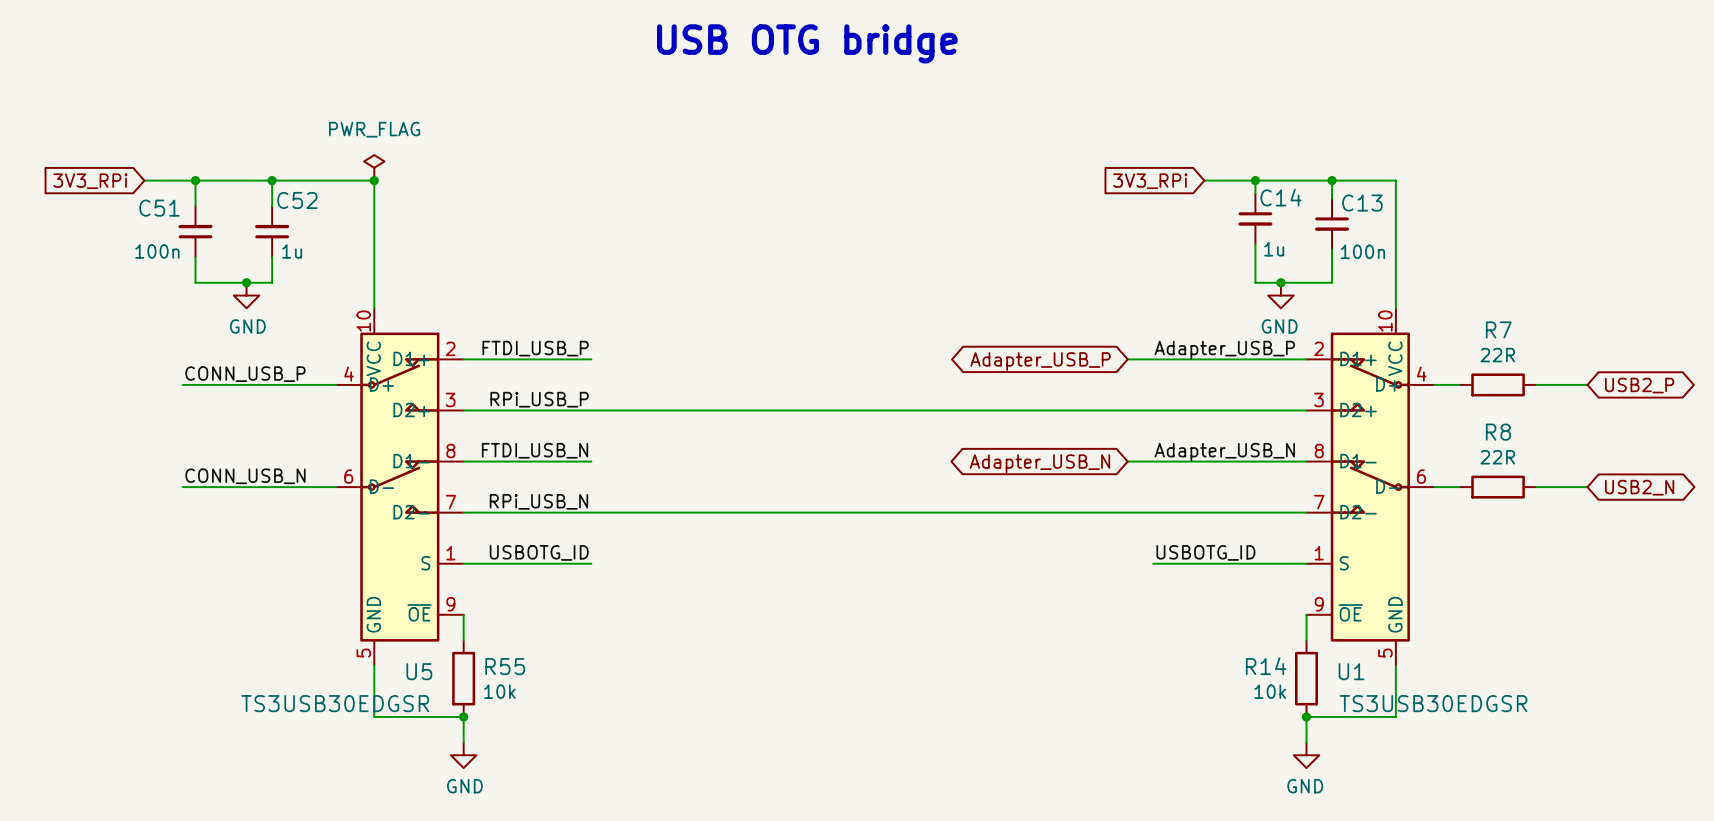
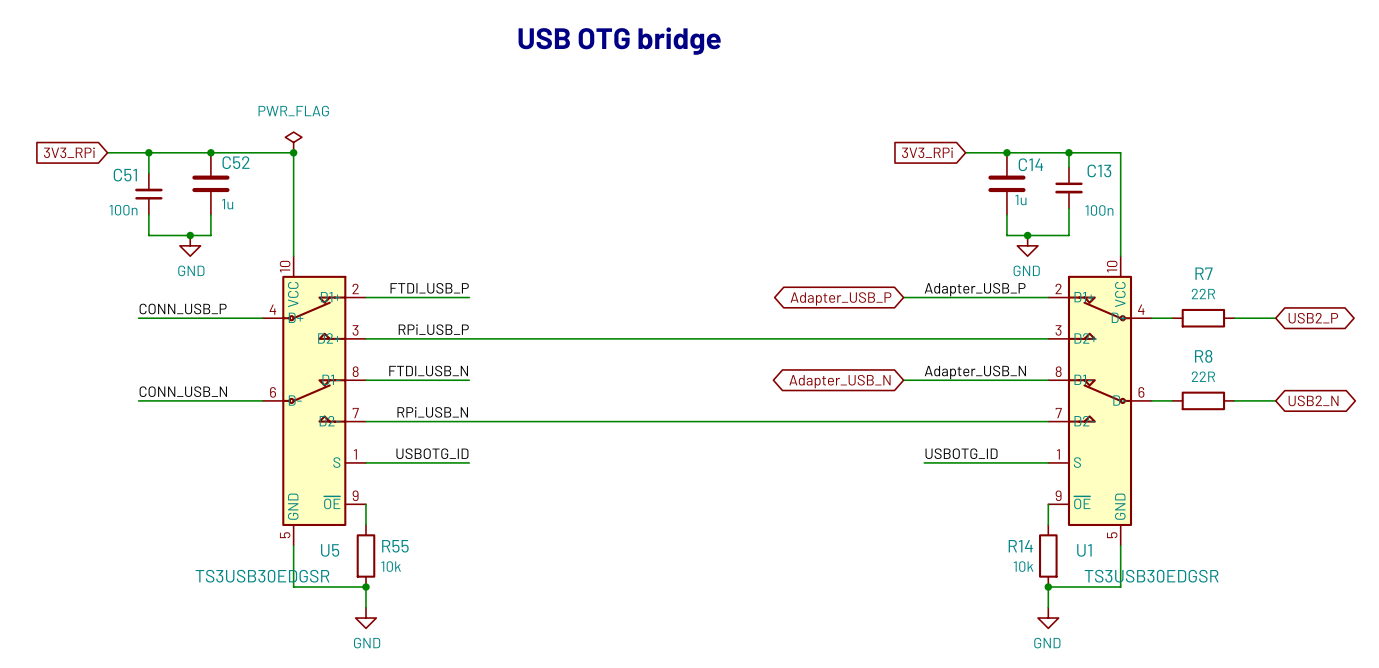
C14 symbol: [1238, 193, 1273, 245] -> [988, 152, 1026, 215]
C52 symbol: [255, 206, 290, 258] -> [192, 152, 230, 215]

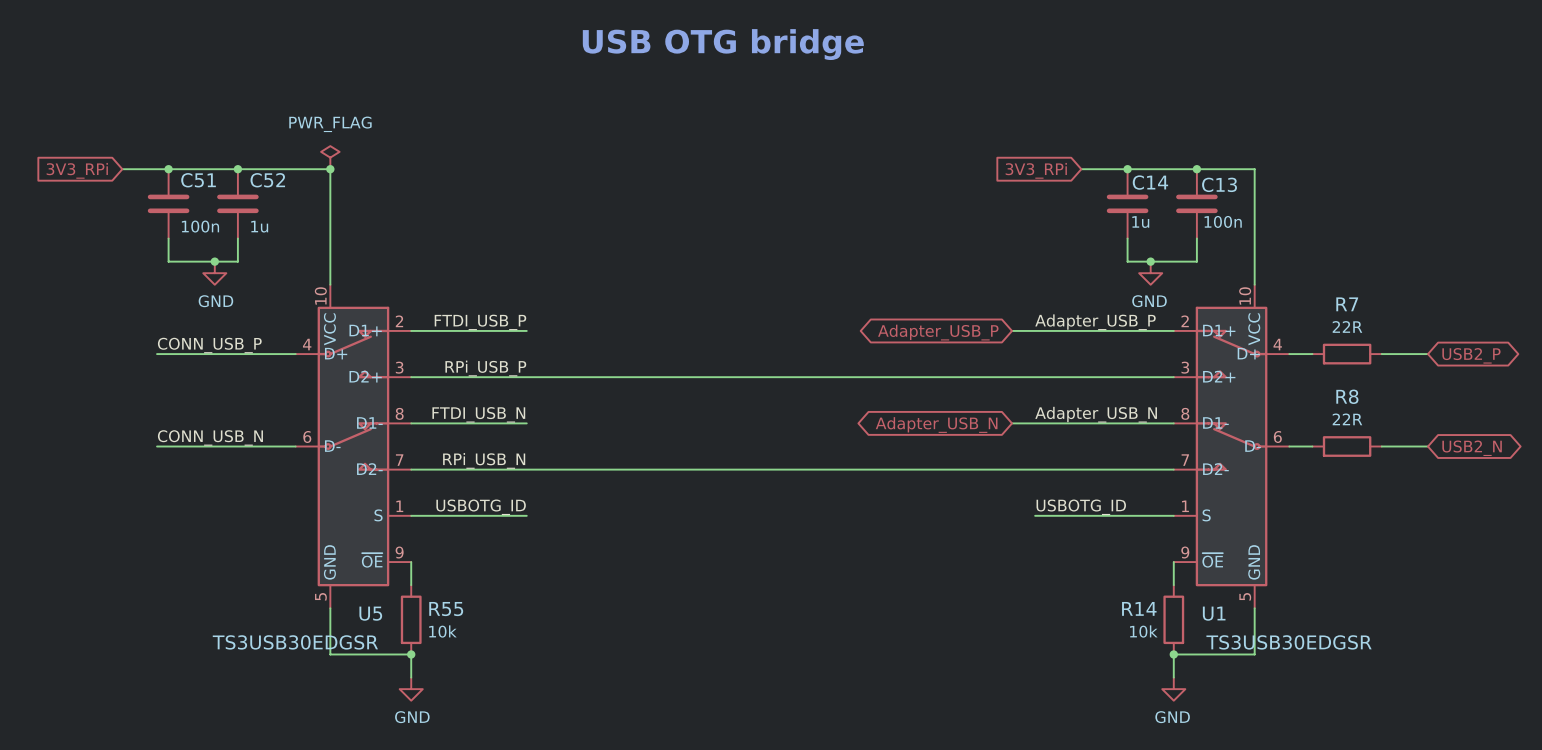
C13 symbol: [1055, 167, 1083, 209] -> [1176, 169, 1218, 239]
C51 symbol: [135, 173, 163, 215] -> [147, 169, 190, 239]
C51 name position: C51 (125, 175) -> C51 (198, 180)
C51 text position: 100n (123, 210) -> 100n (200, 226)

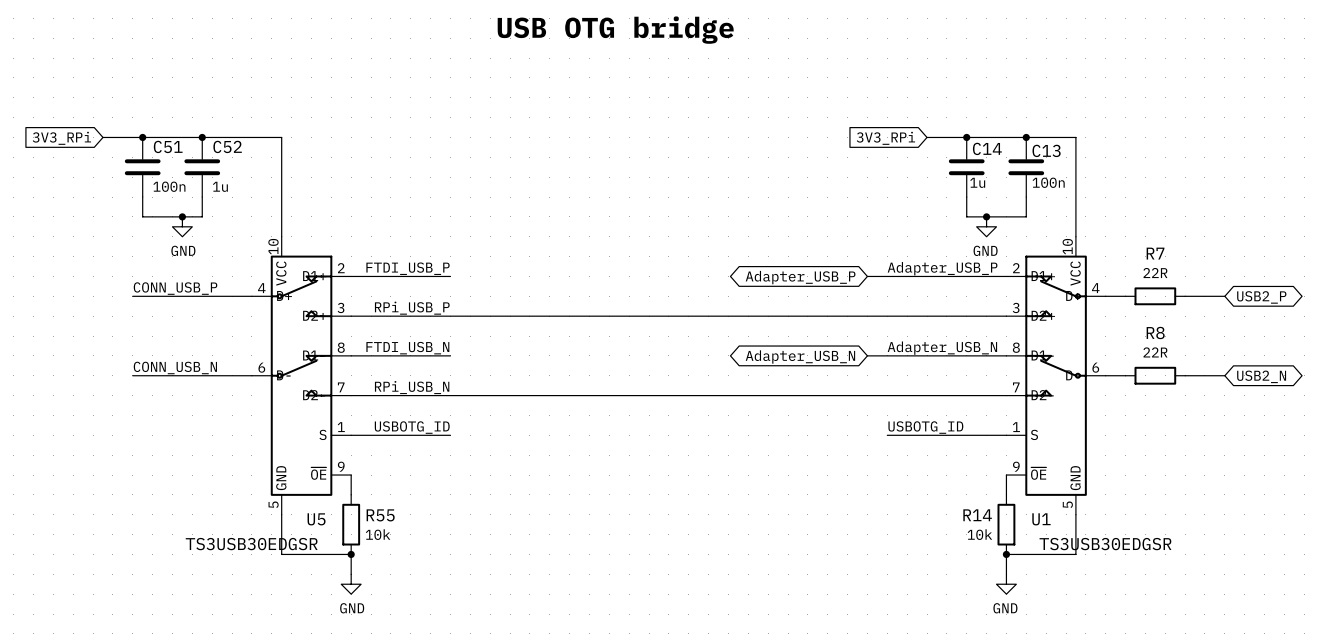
power symbol: PWR_FLAG (330, 157) -> none
junction: (330, 169) -> none

